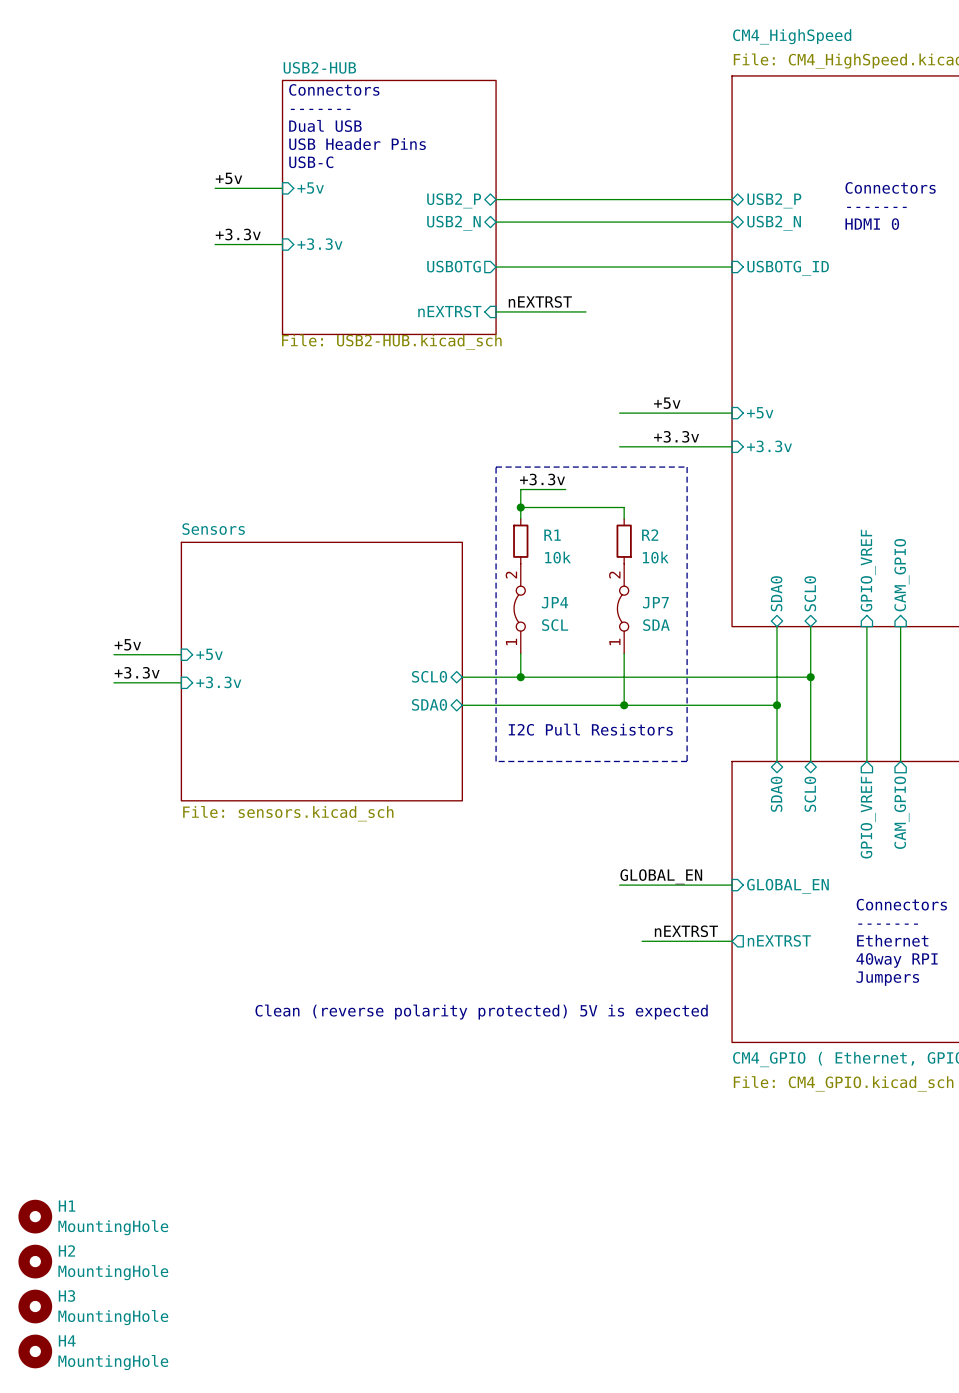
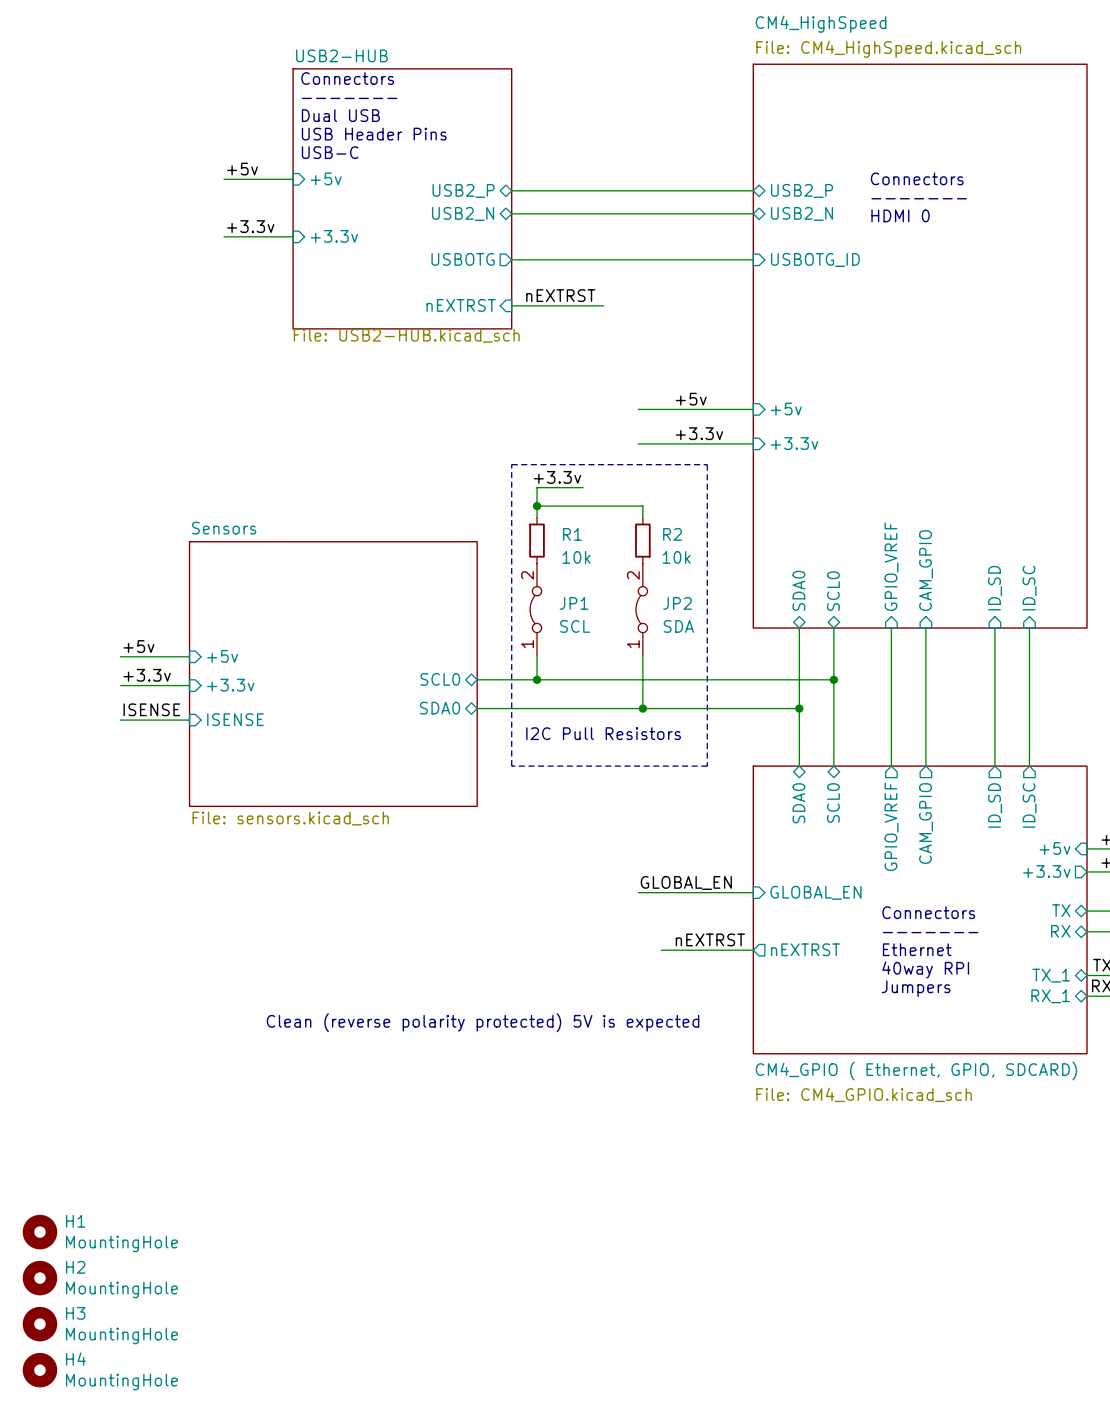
JP4 name: JP4 (554, 602) -> JP1 (573, 603)
JP7 name: JP7 (655, 602) -> JP2 (677, 603)
label: none -> ISENSE (151, 709)
wire: none -> (120, 720) (189, 720)
sheet pin: none -> ISENSE (235, 719)

